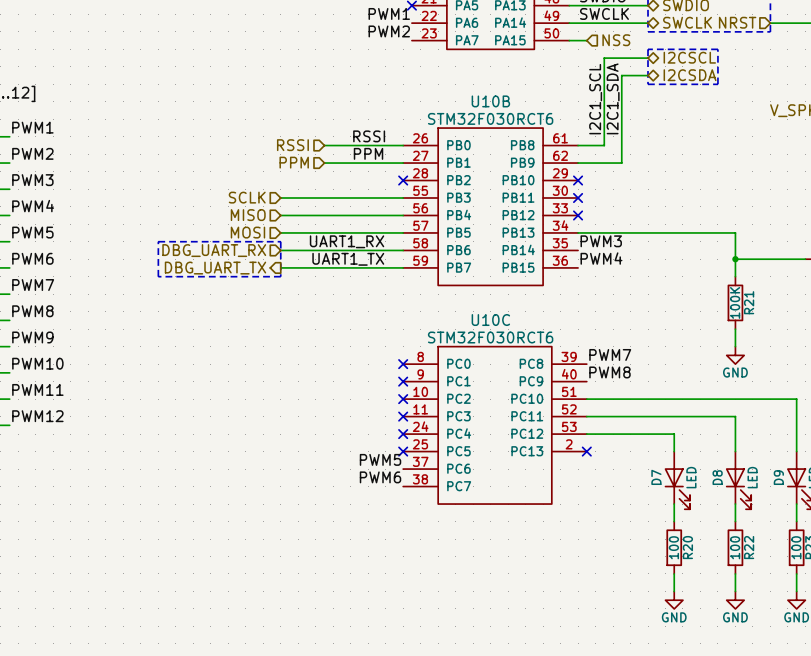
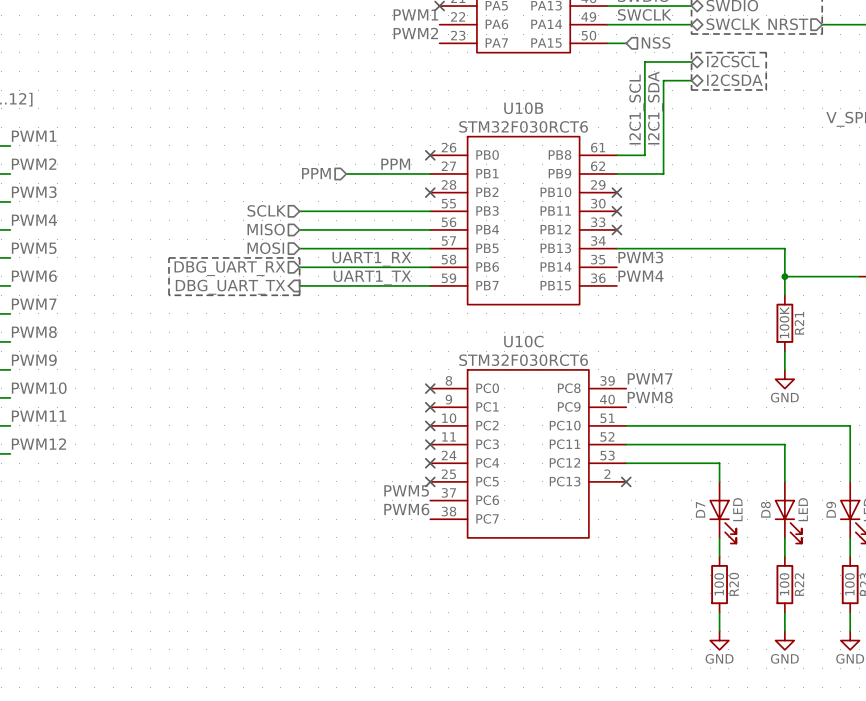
label: RSSI (369, 136) -> none
hierarchical label: RSSI (292, 145) -> none
wire: (324, 145) (403, 145) -> none
no-connect mark: none -> (430, 155)

